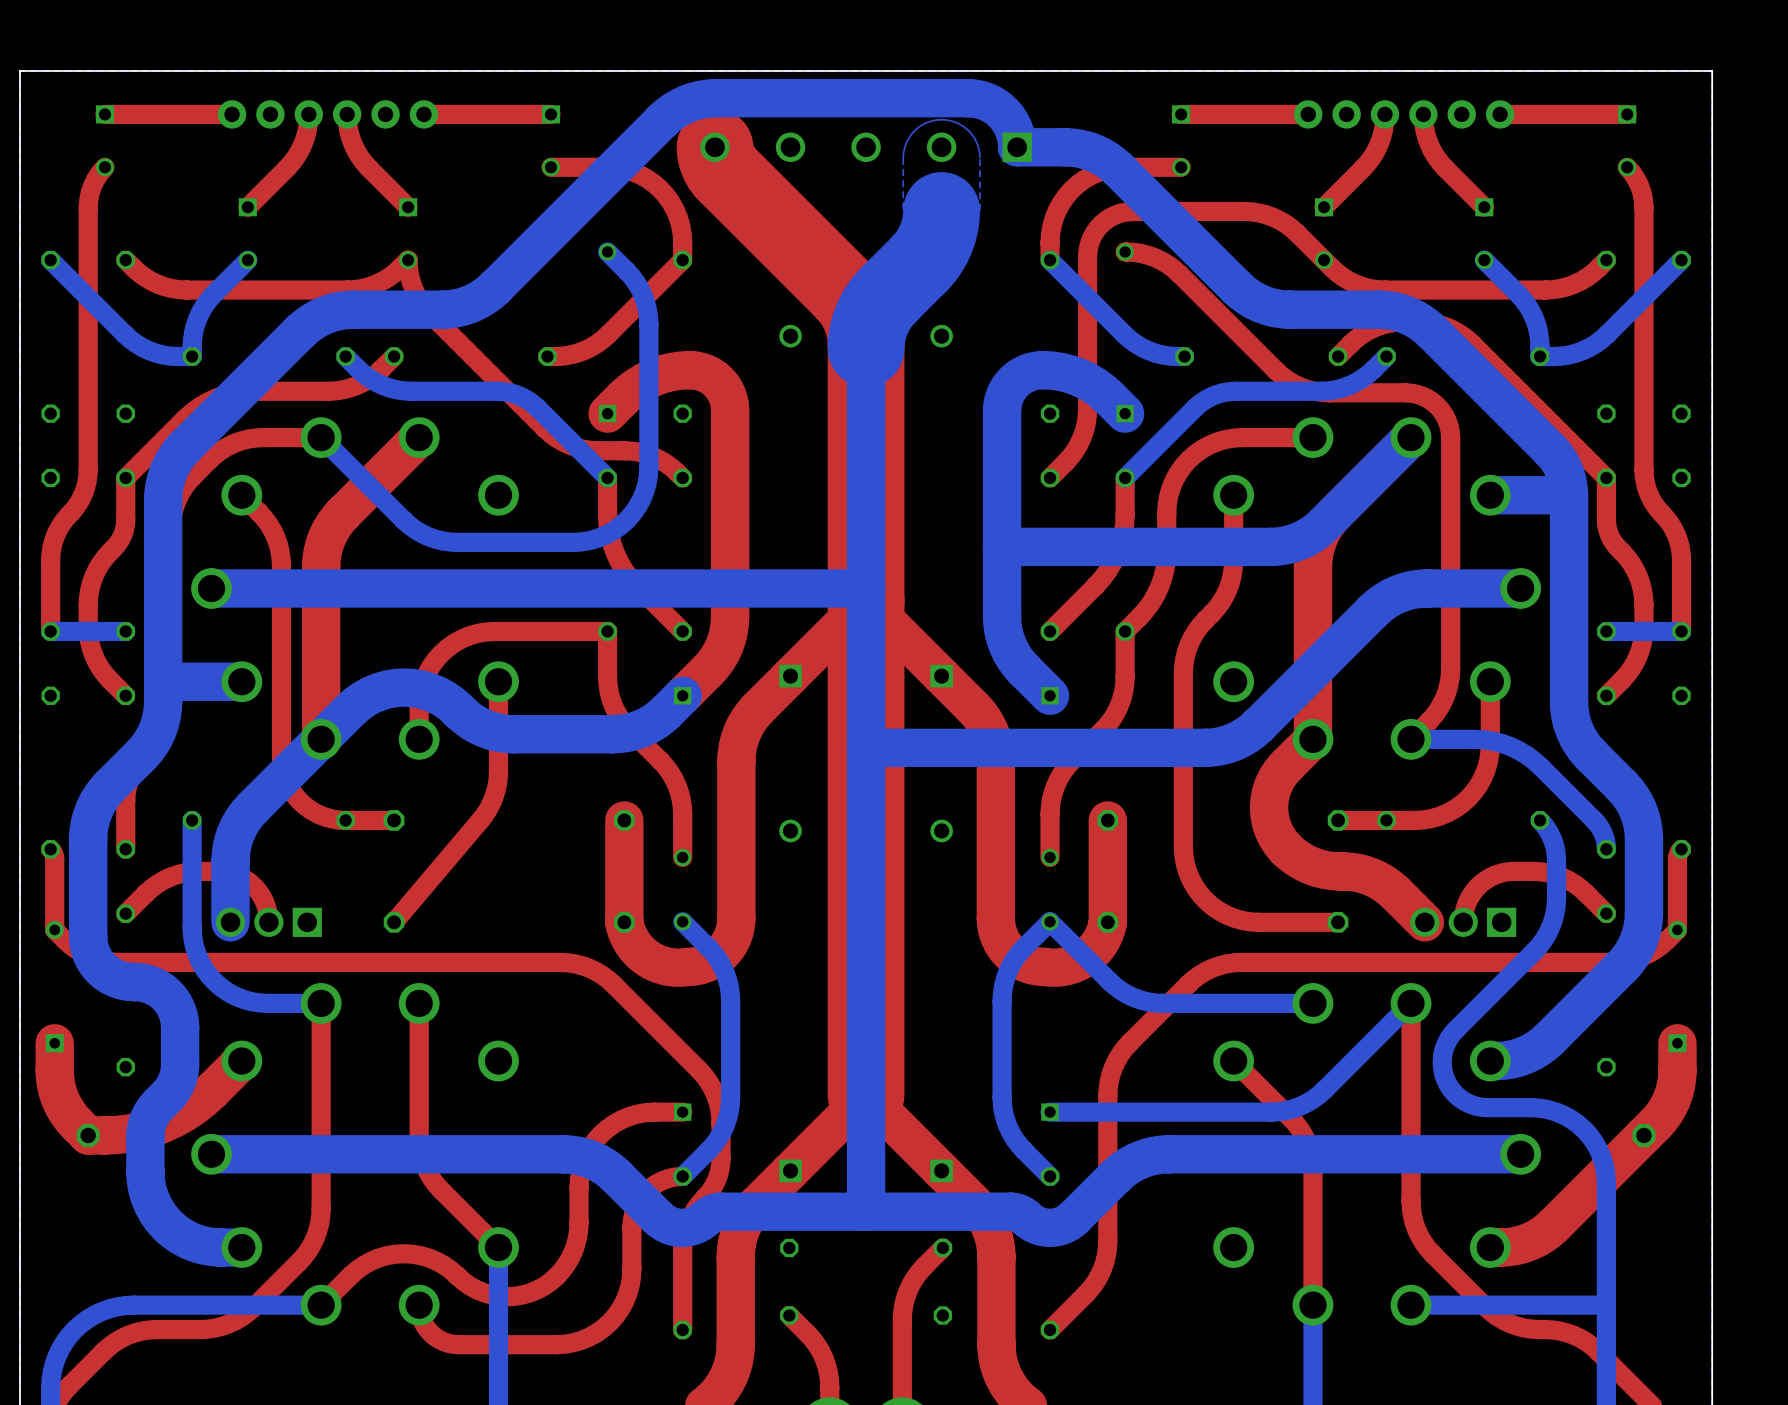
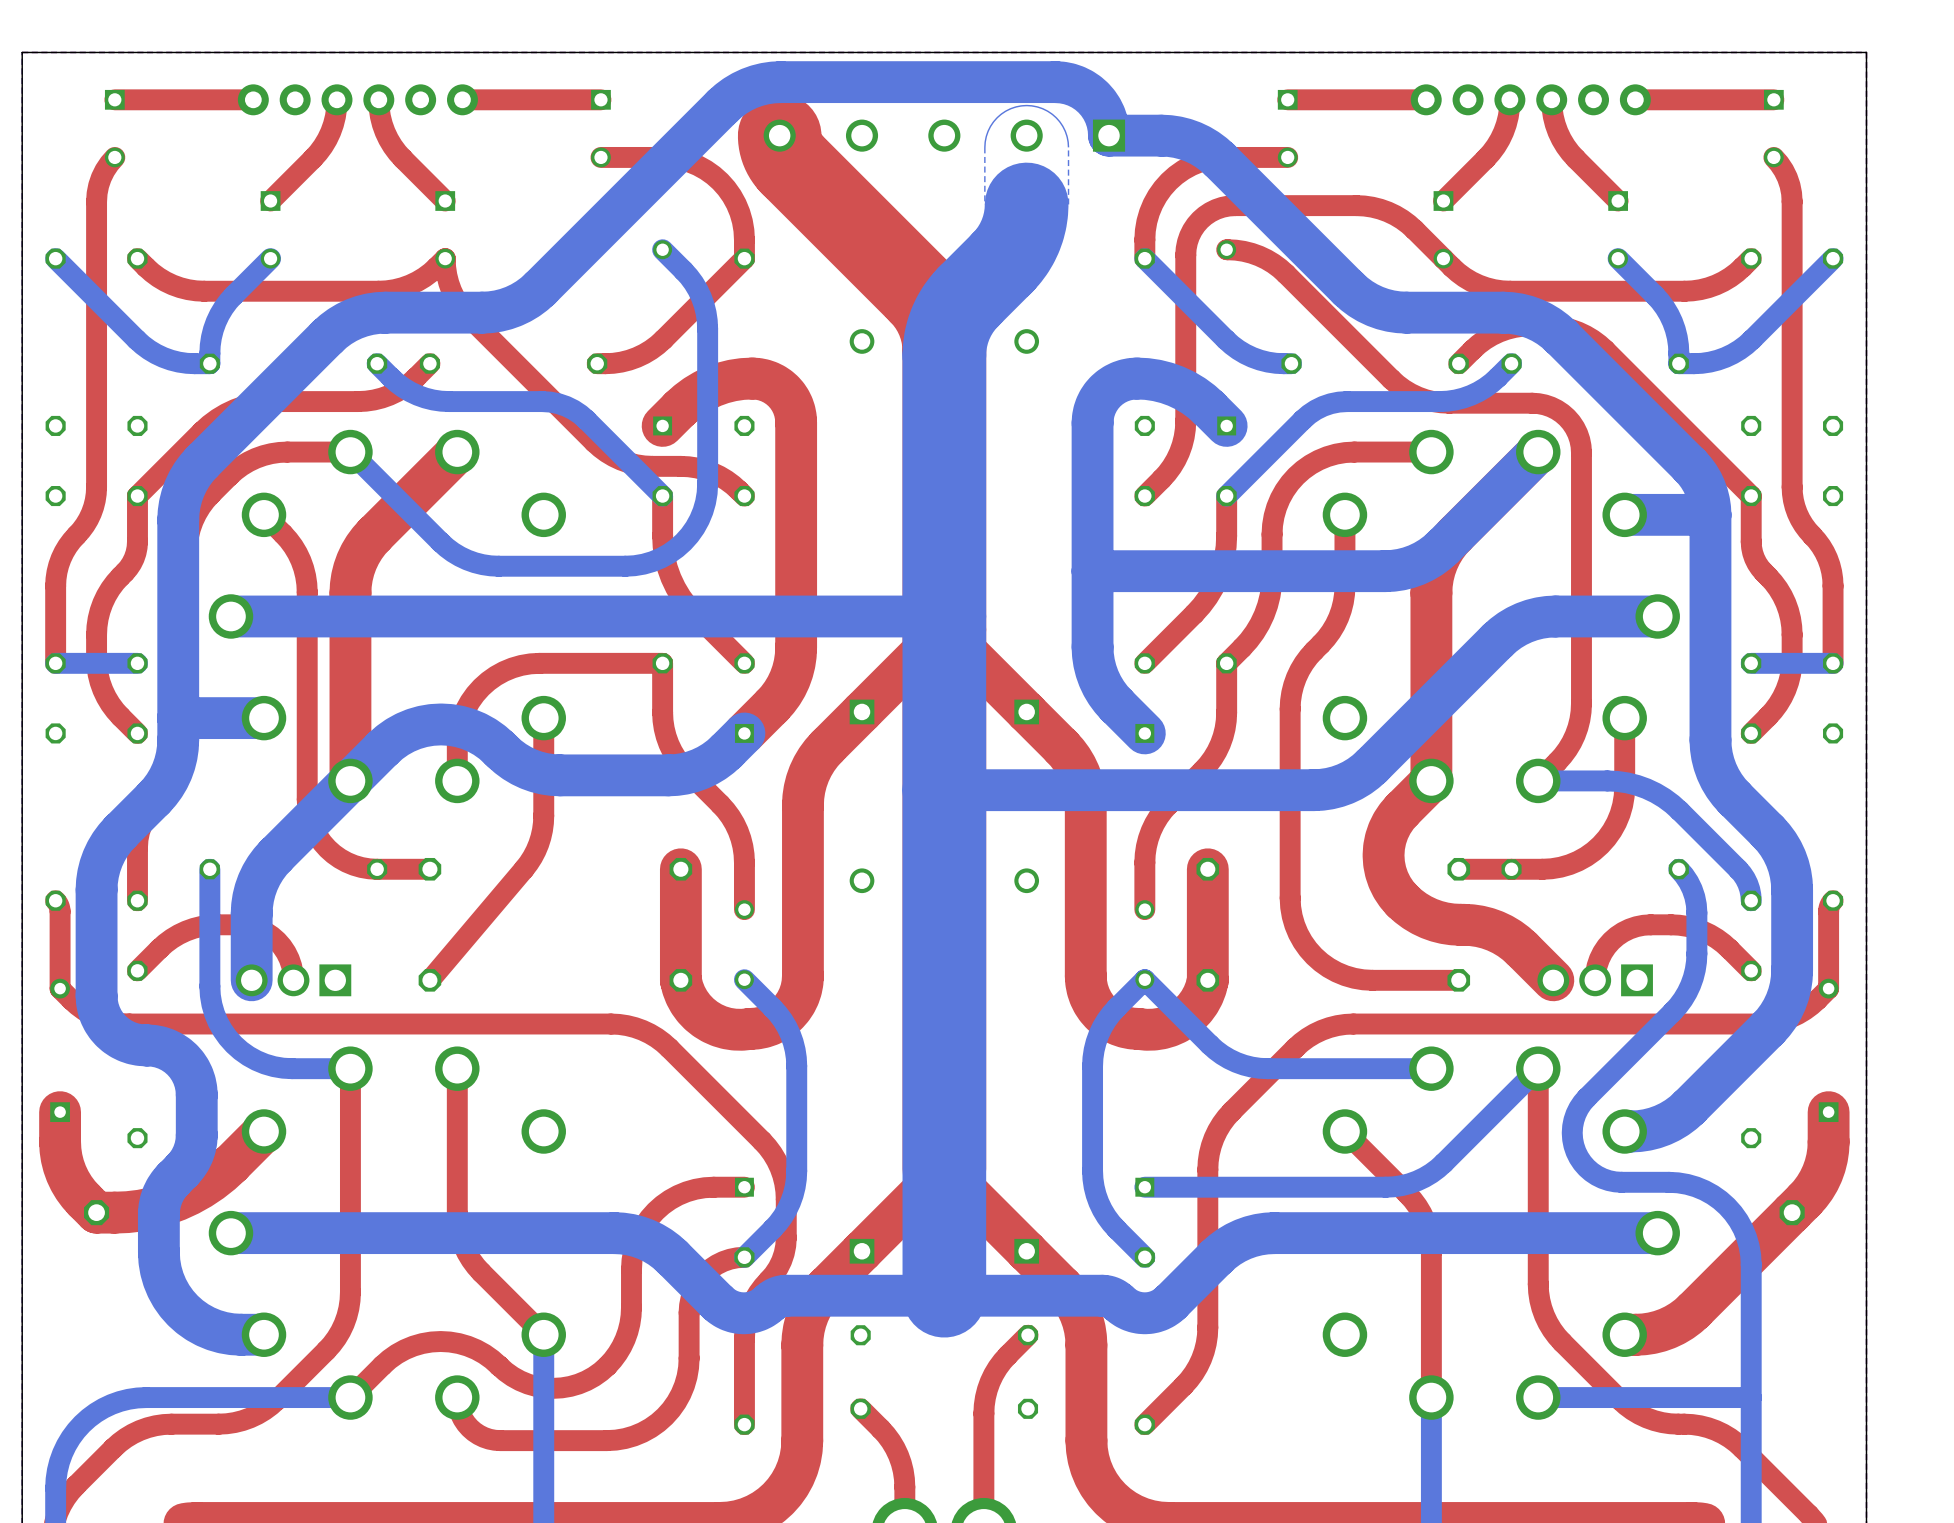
bottom track width: thin (866, 348) (866, 1211) -> thick (944, 354) (944, 1295)

